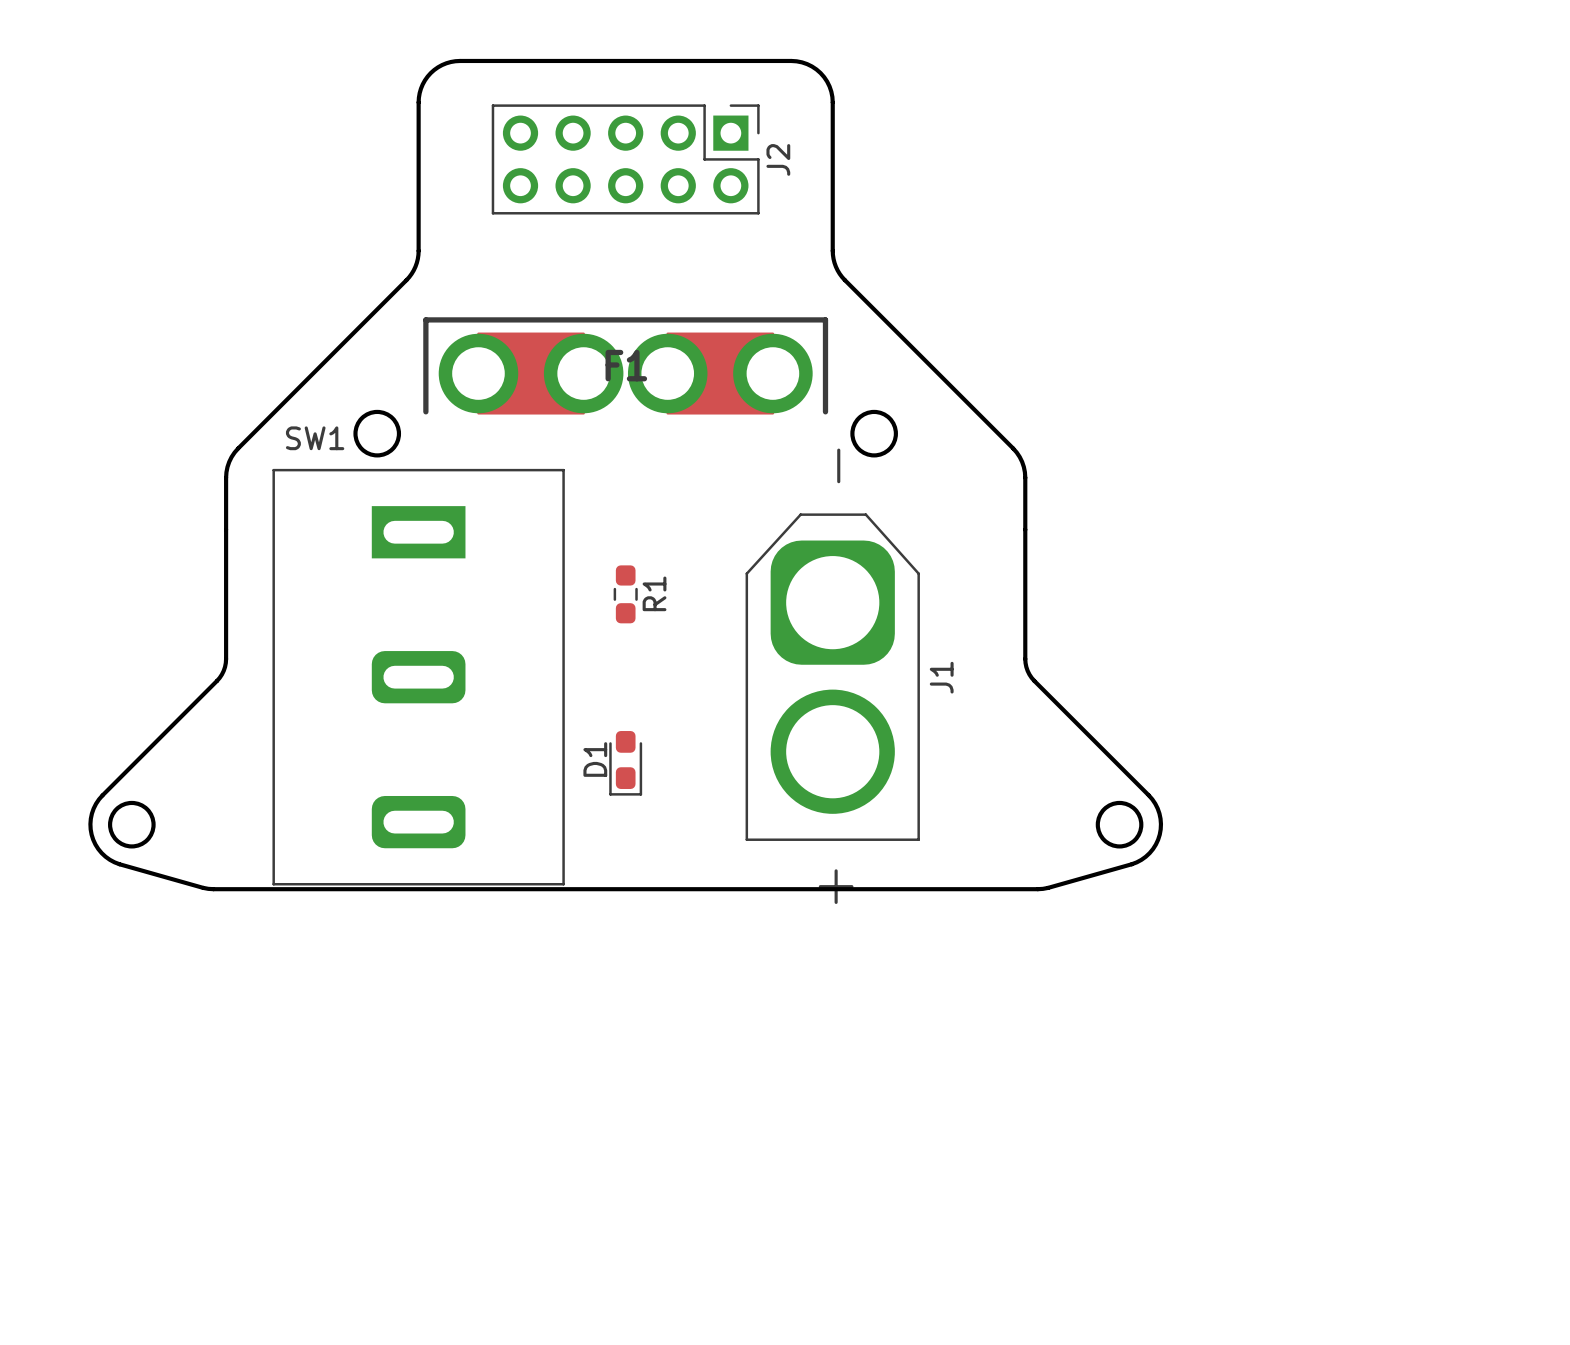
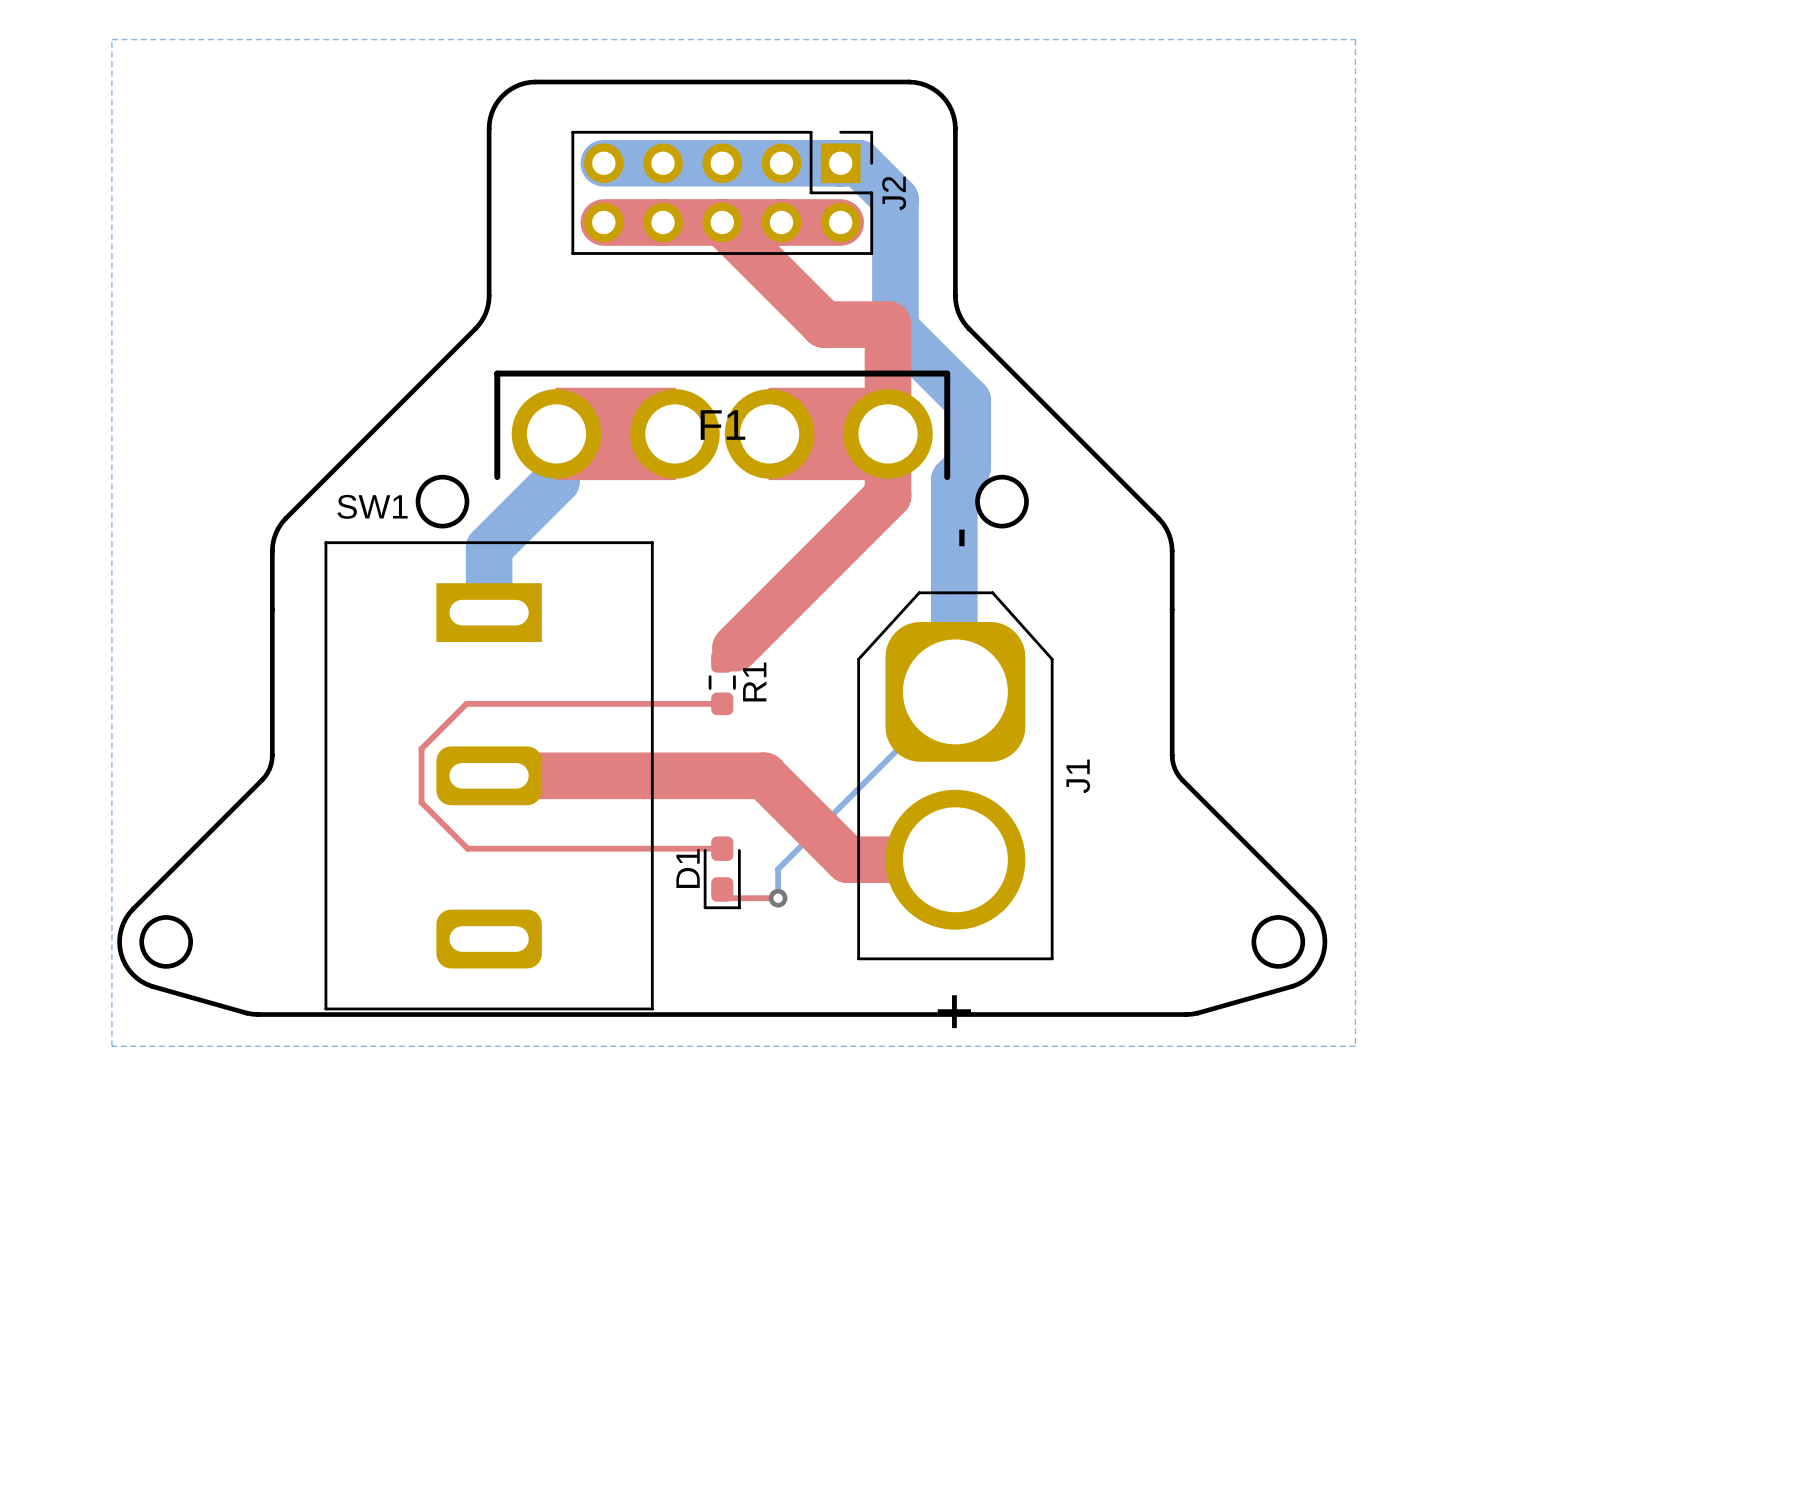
bottom zone outline: none -> (111, 39) (111, 1046) (1355, 1046) (1355, 39) (111, 39)
bottom track: none -> (603, 163) (858, 163) (895, 199) (895, 328) (967, 400) (967, 466) (954, 480) (955, 691) (778, 869) (778, 898)
top track: none -> (603, 222) (840, 222)
top track: none -> (722, 222) (824, 324) (888, 324) (888, 495) (722, 661)
bottom track: none -> (556, 433) (556, 480) (489, 548) (489, 612)
top track: none -> (722, 703) (466, 703) (421, 748) (421, 802) (467, 848) (722, 848)
top track: none -> (489, 775) (763, 775) (847, 859) (955, 859)
top track: none -> (722, 889) (731, 898) (778, 898)
via: none -> (778, 898)

